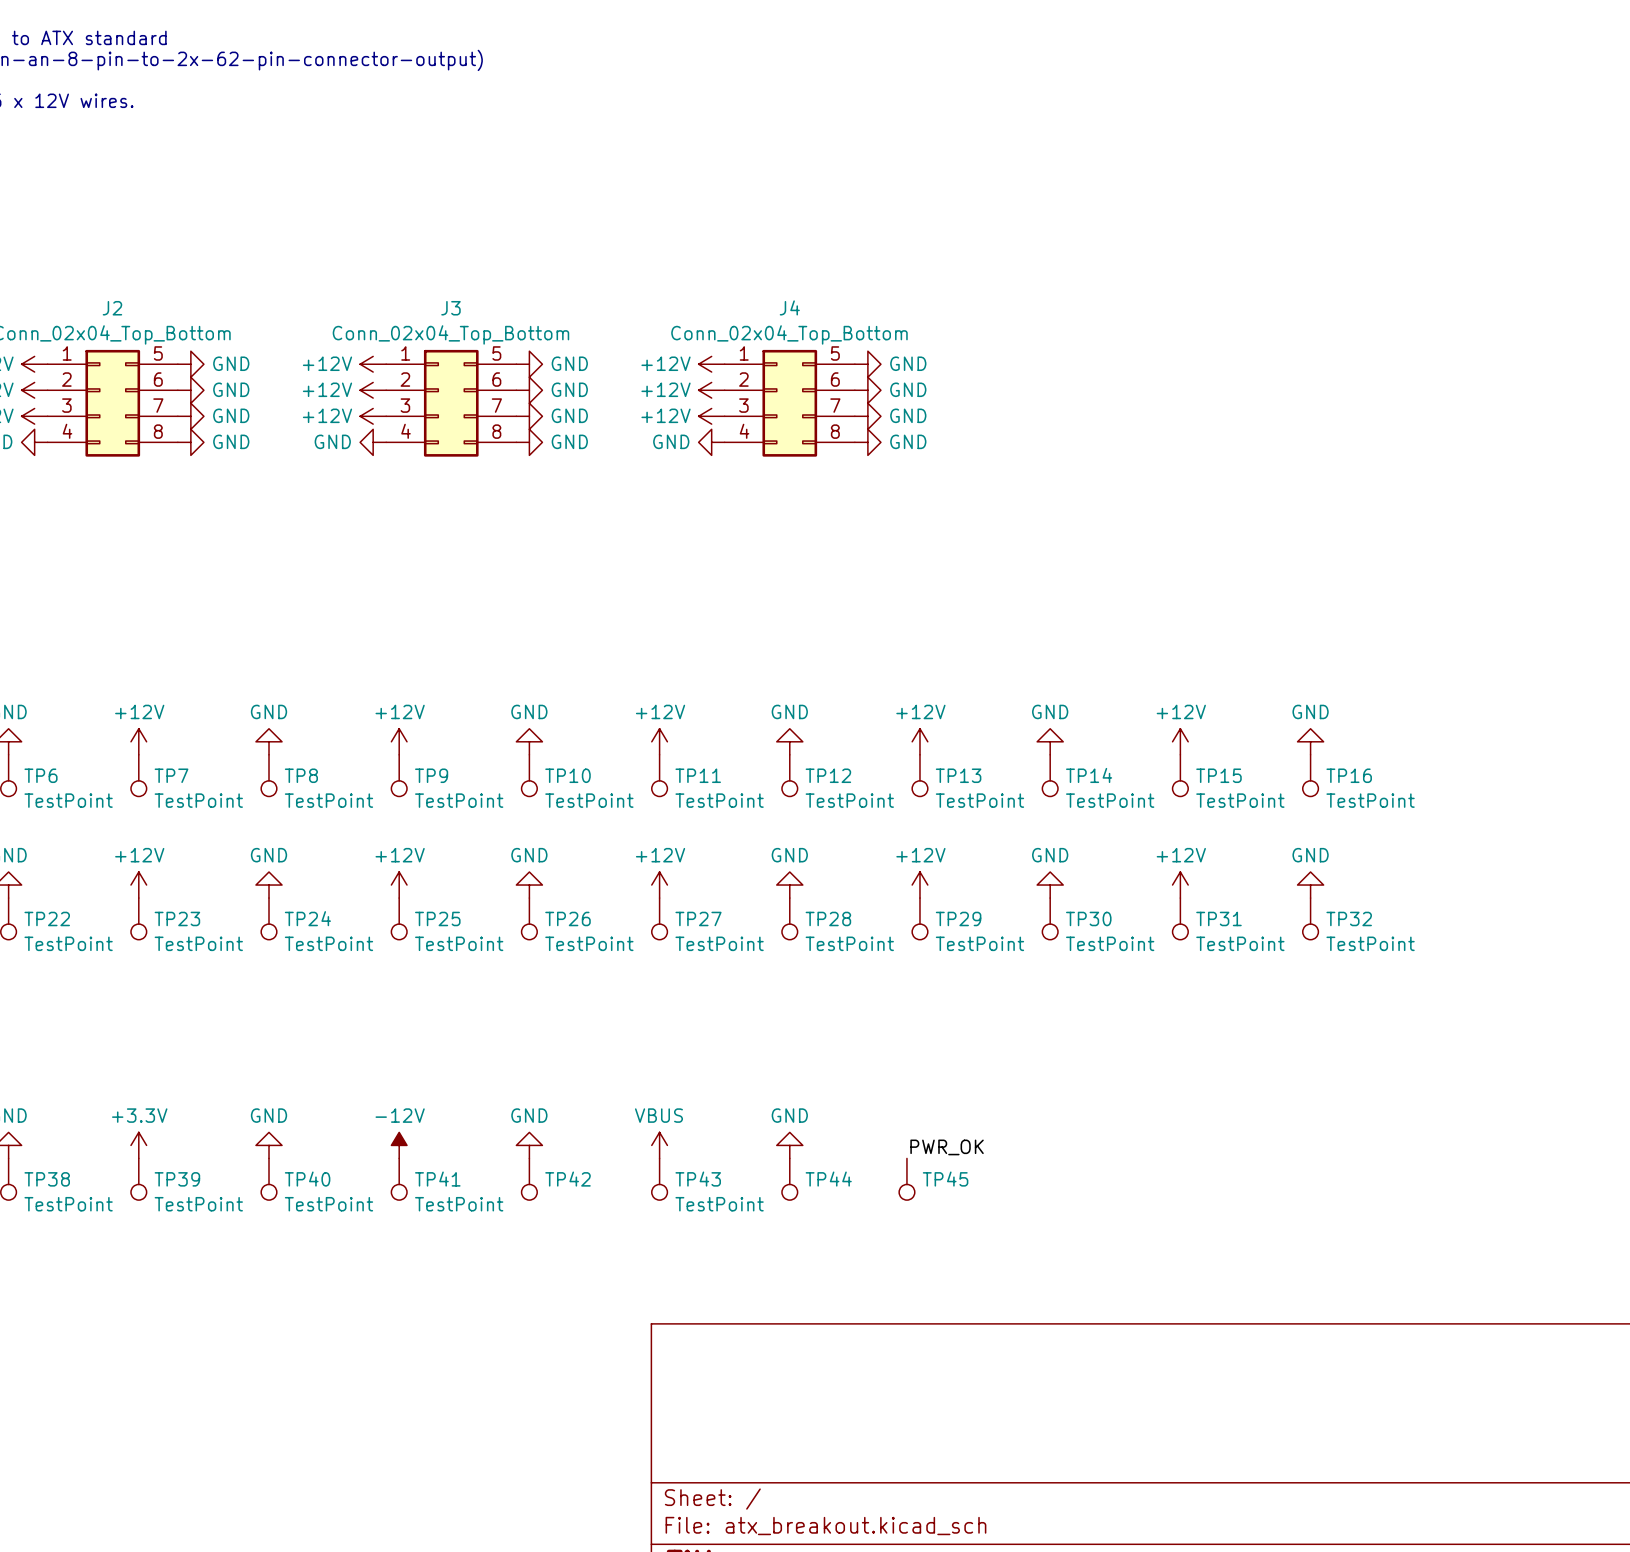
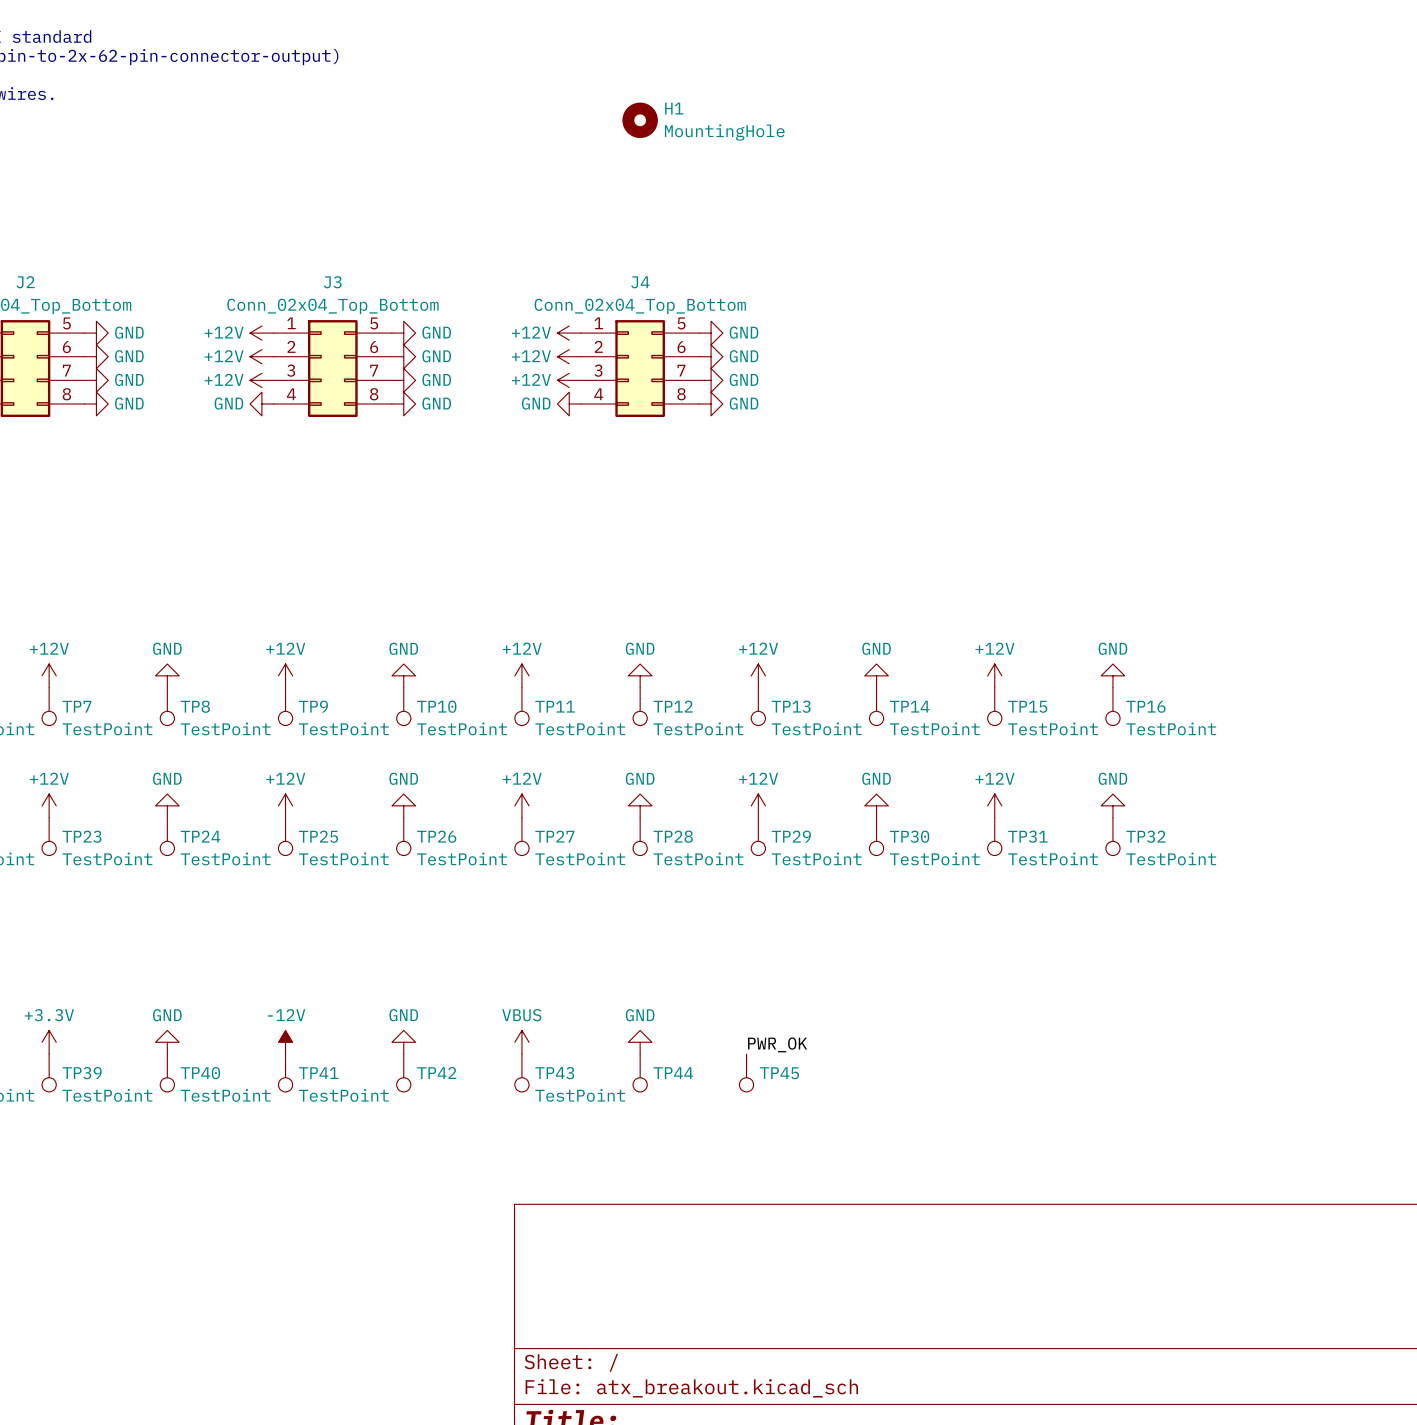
H1: none -> MountingHole (640, 120)

